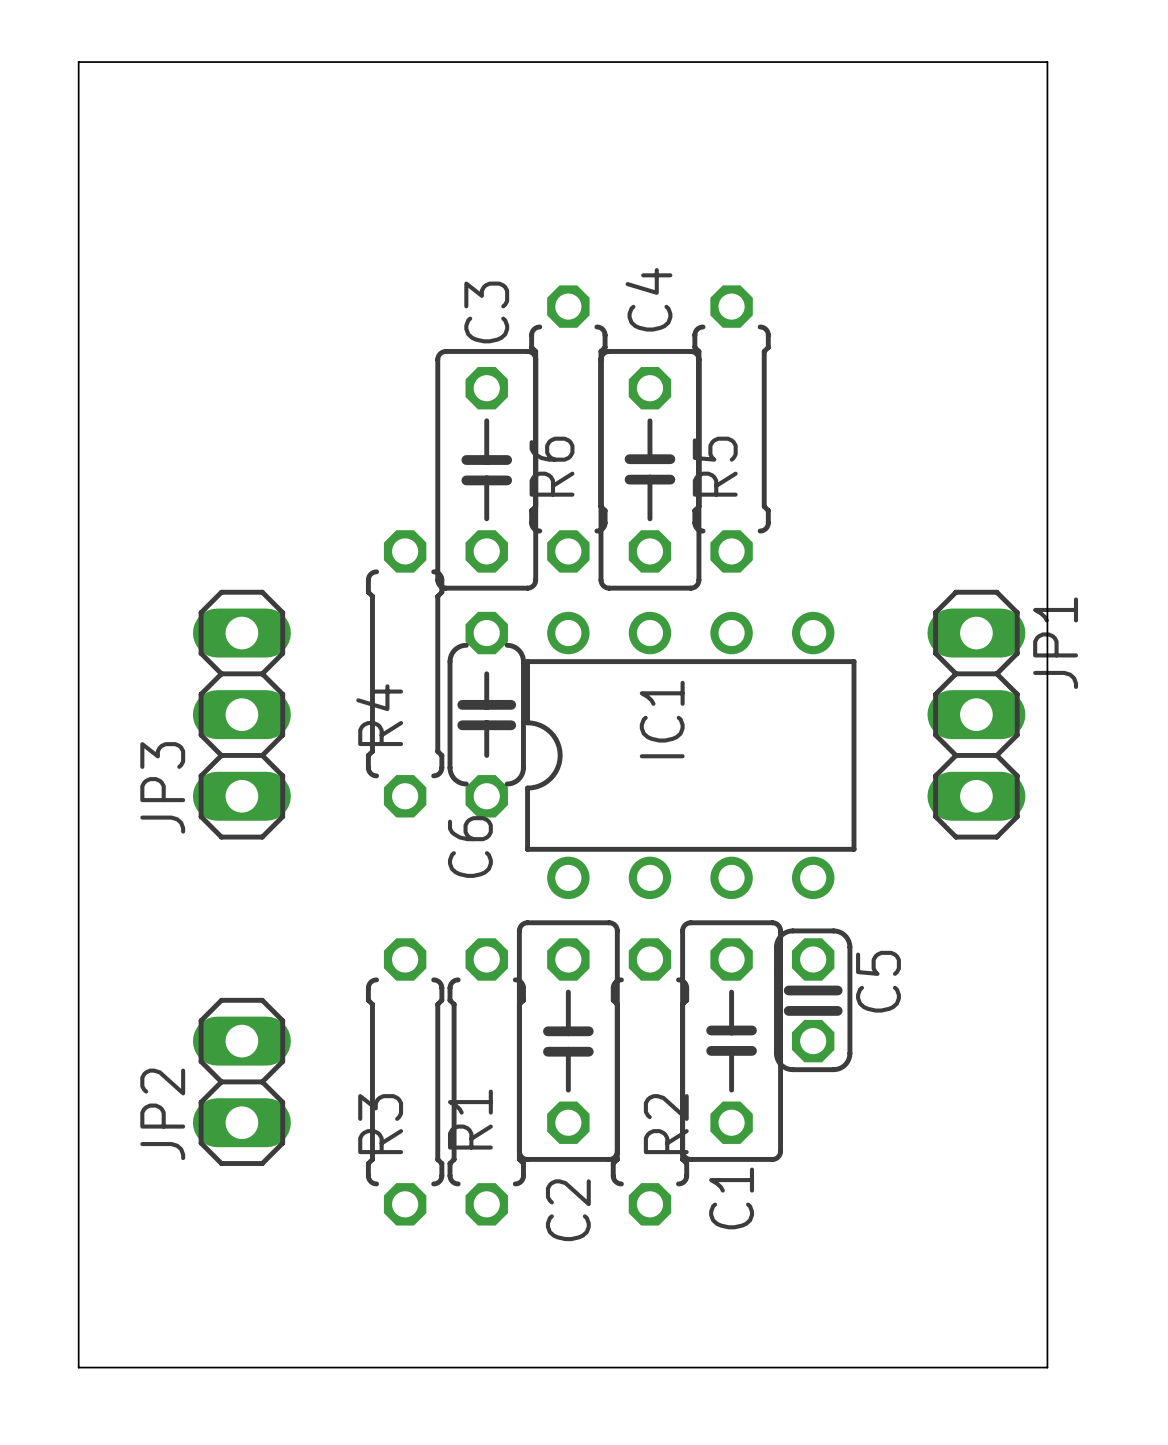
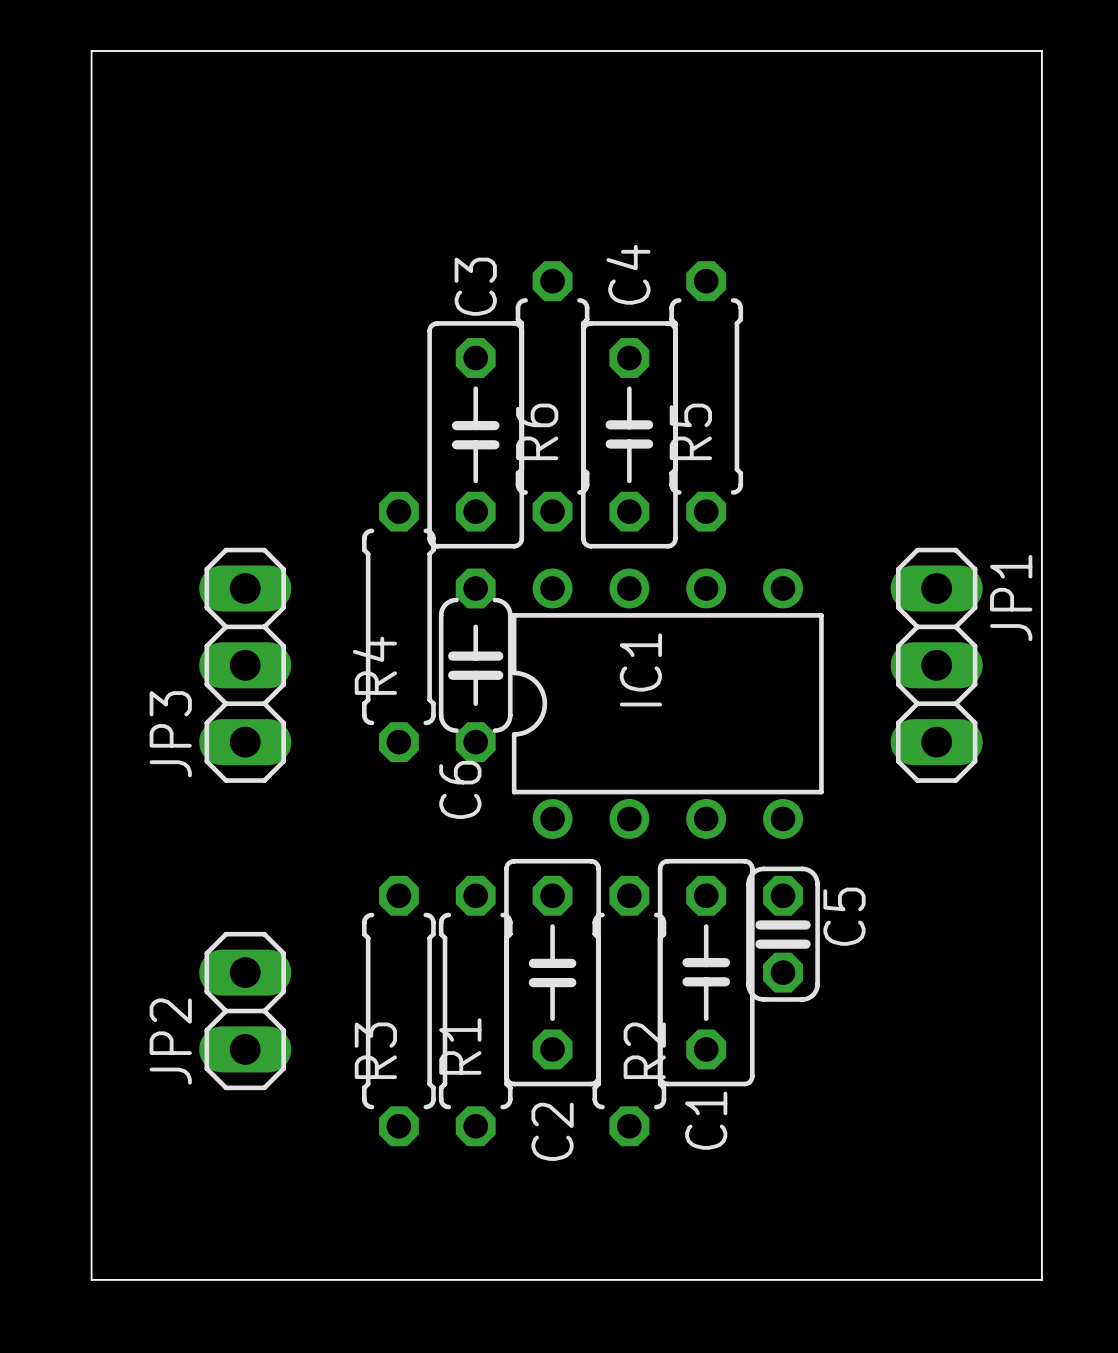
board edge: (1047, 62) (1047, 1367) -> (1003, 50) (1041, 50) (1041, 1279) (1003, 1279)

